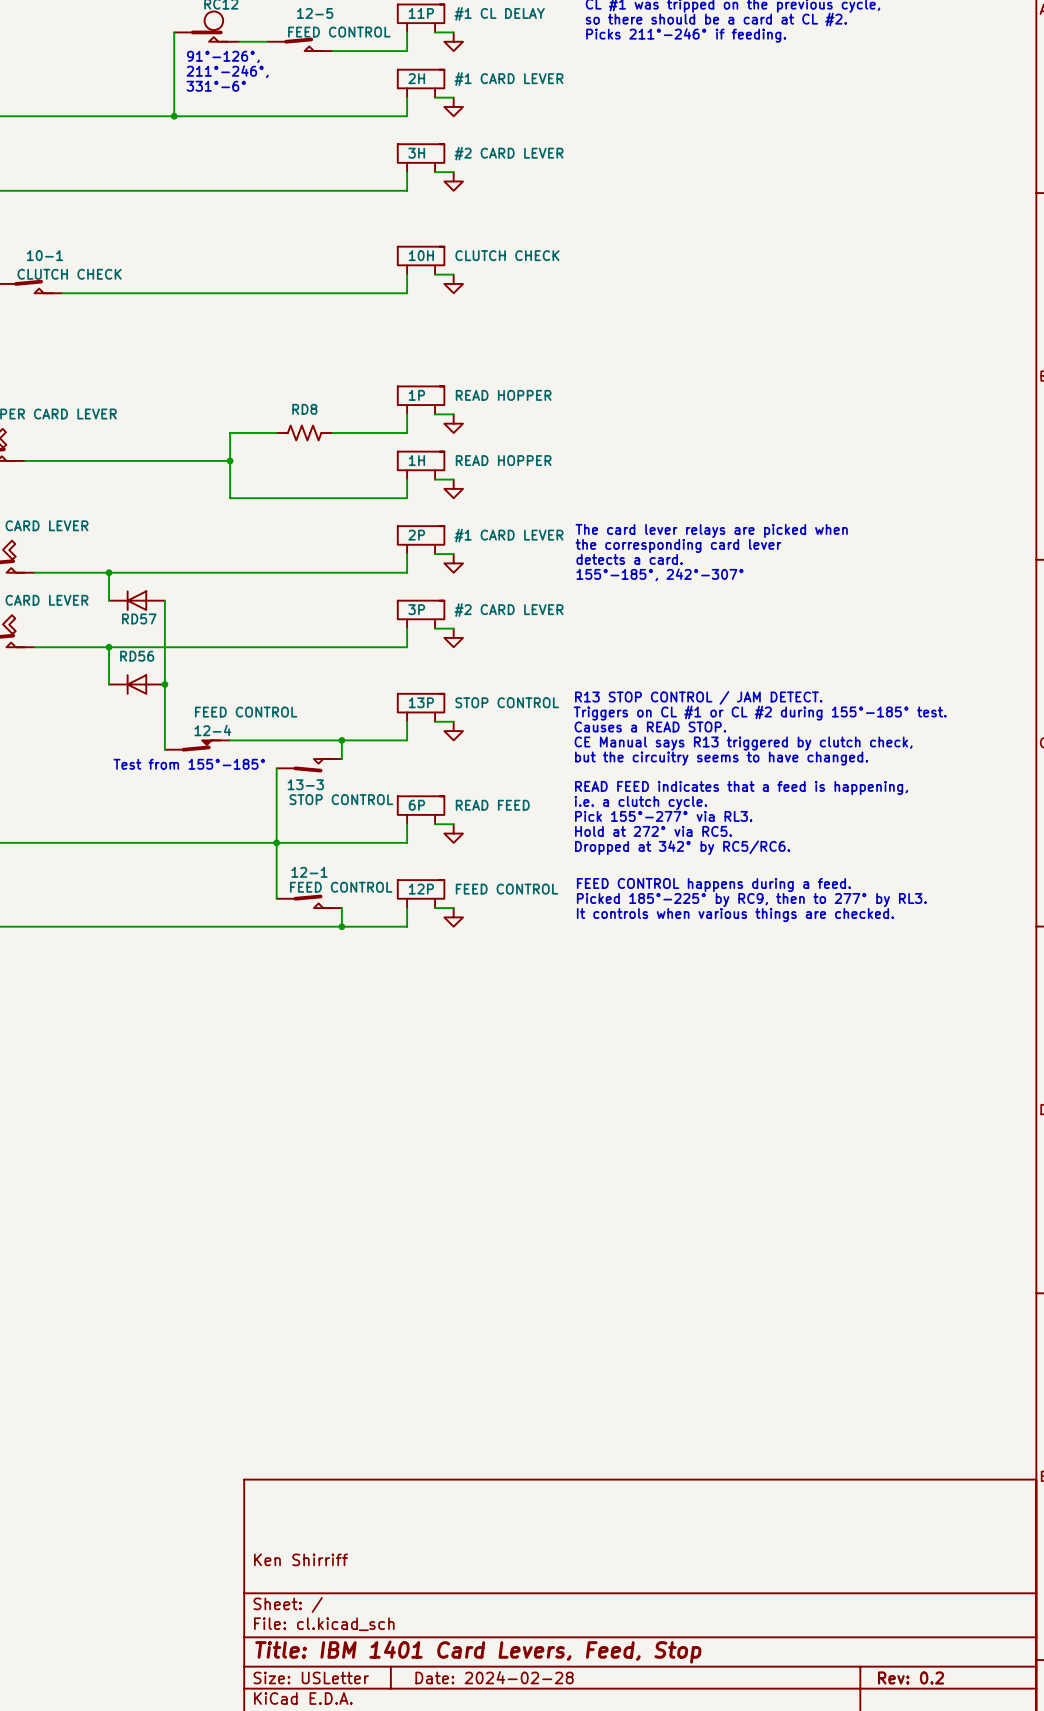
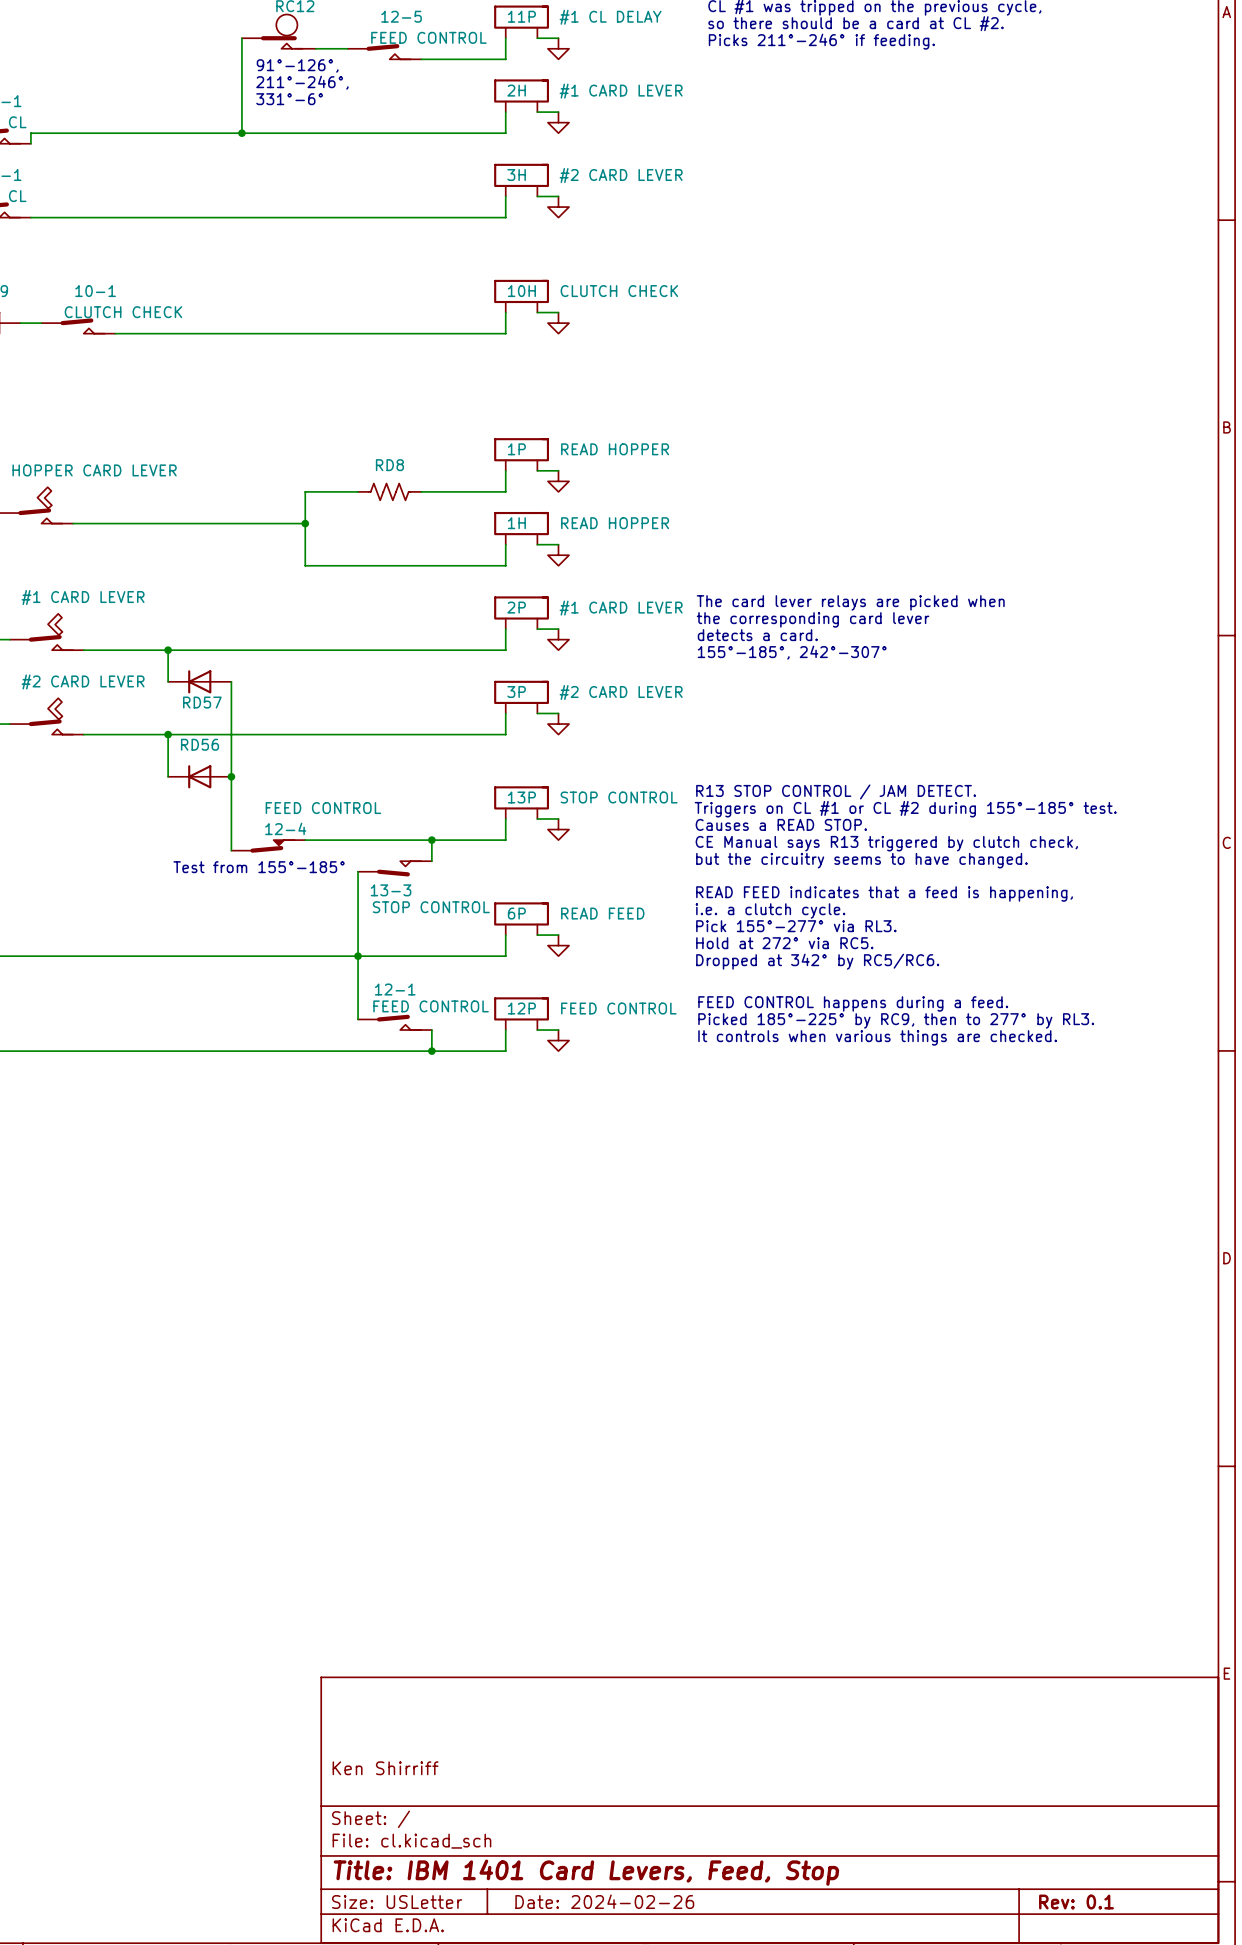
title block: Date: 2024-02-28 (494, 1677) -> Date: 2024-02-26 (604, 1901)
title block: Rev: 0.2 (911, 1677) -> Rev: 0.1 (1076, 1902)

